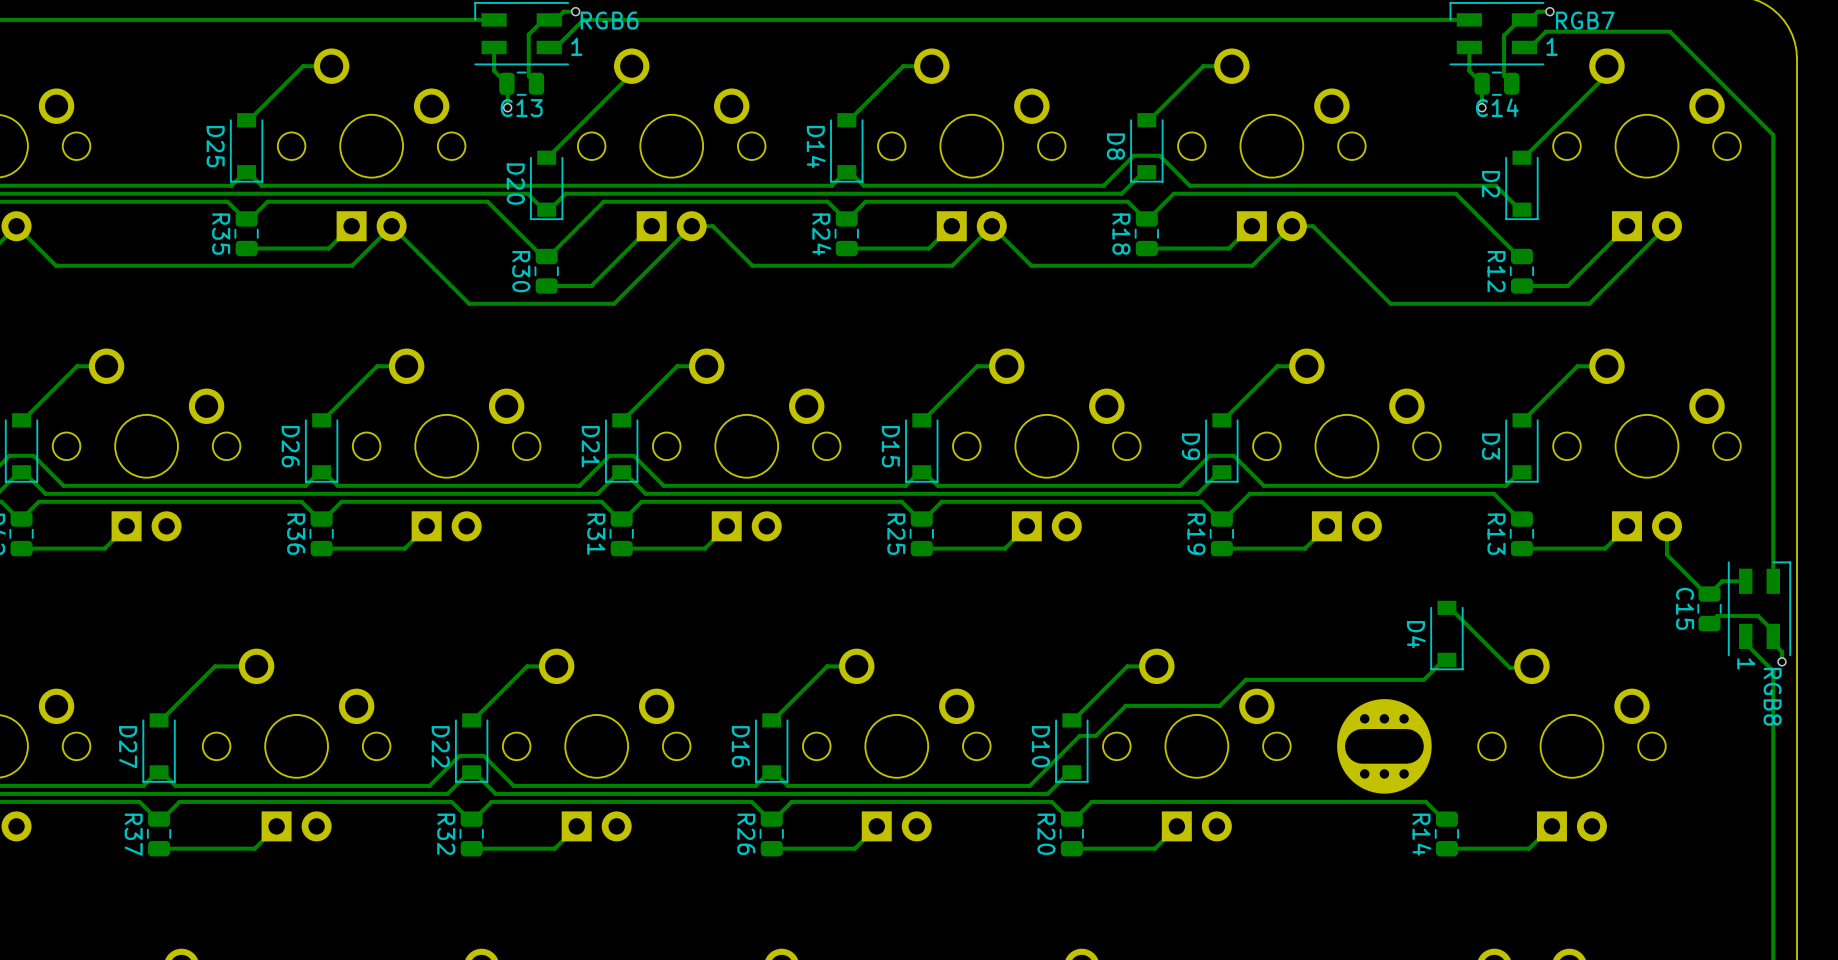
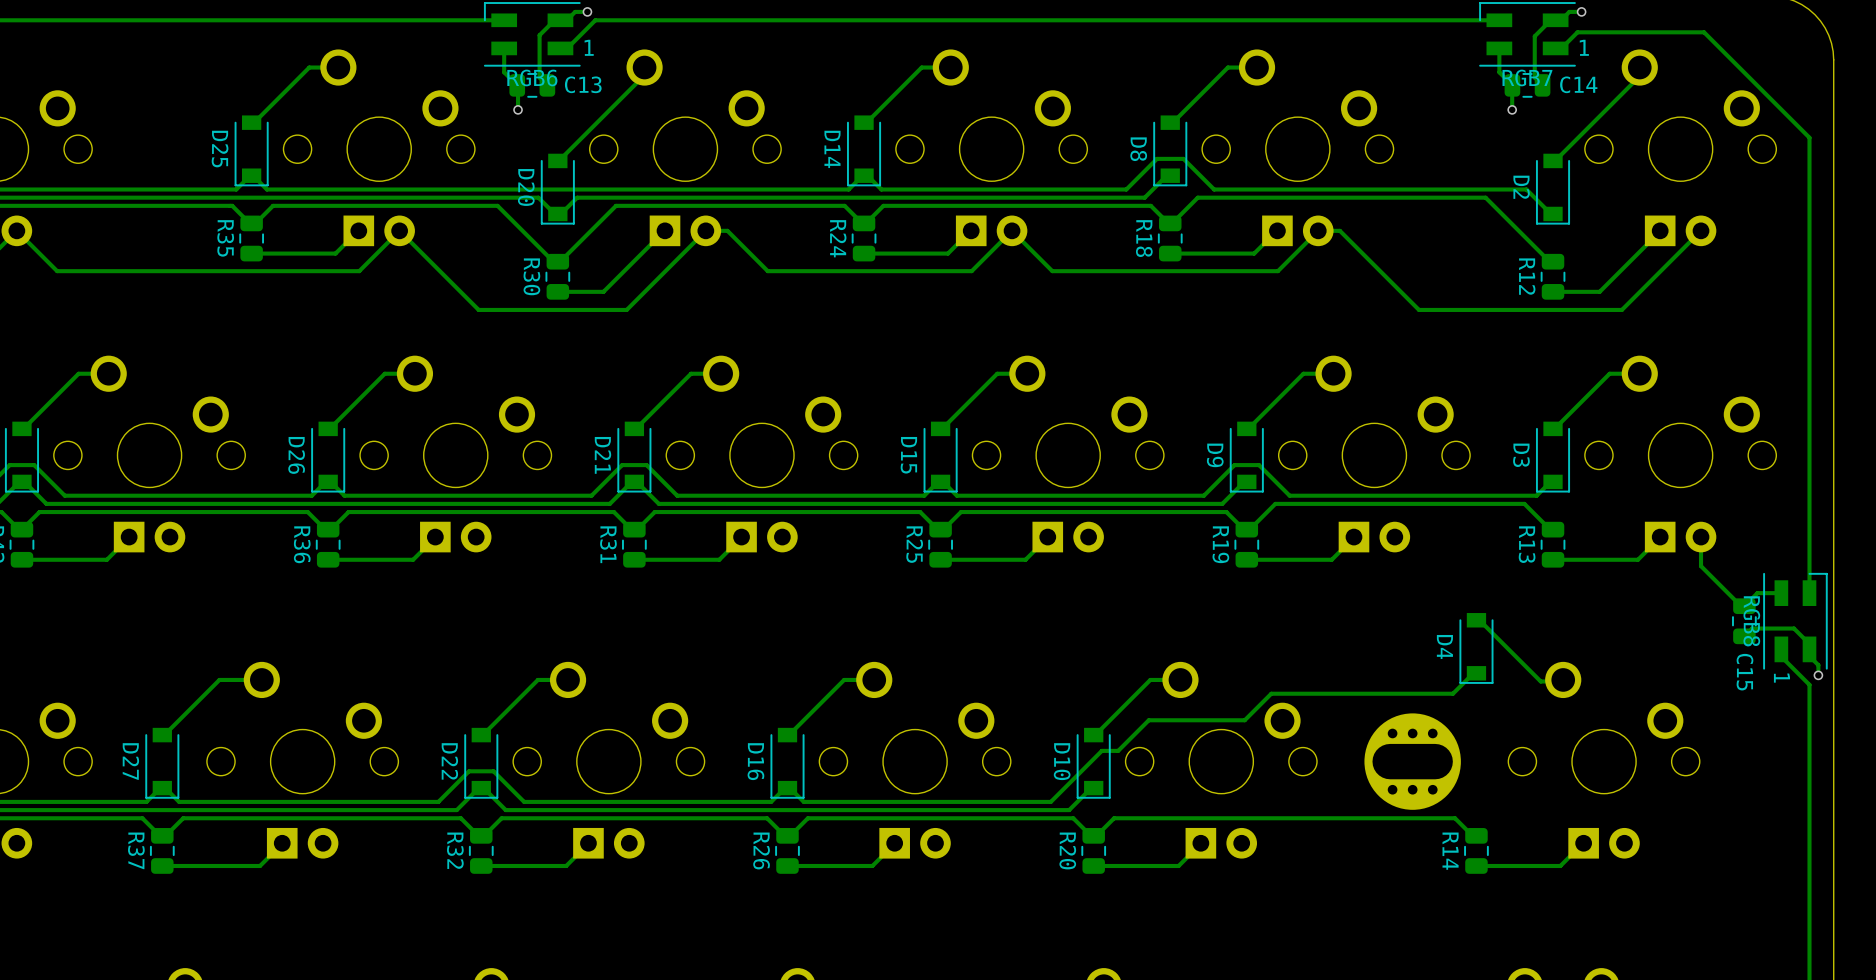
RGB6 name position: RGB6 (609, 20) -> RGB6 (532, 77)
RGB7 name position: RGB7 (1585, 20) -> RGB7 (1527, 77)
C14 name position: C14 (1497, 107) -> C14 (1578, 84)
C13 name position: C13 (521, 108) -> C13 (583, 84)
C15 name position: C15 (1685, 608) -> C15 (1744, 672)
RGB8 name position: RGB8 (1772, 696) -> RGB8 (1751, 621)

